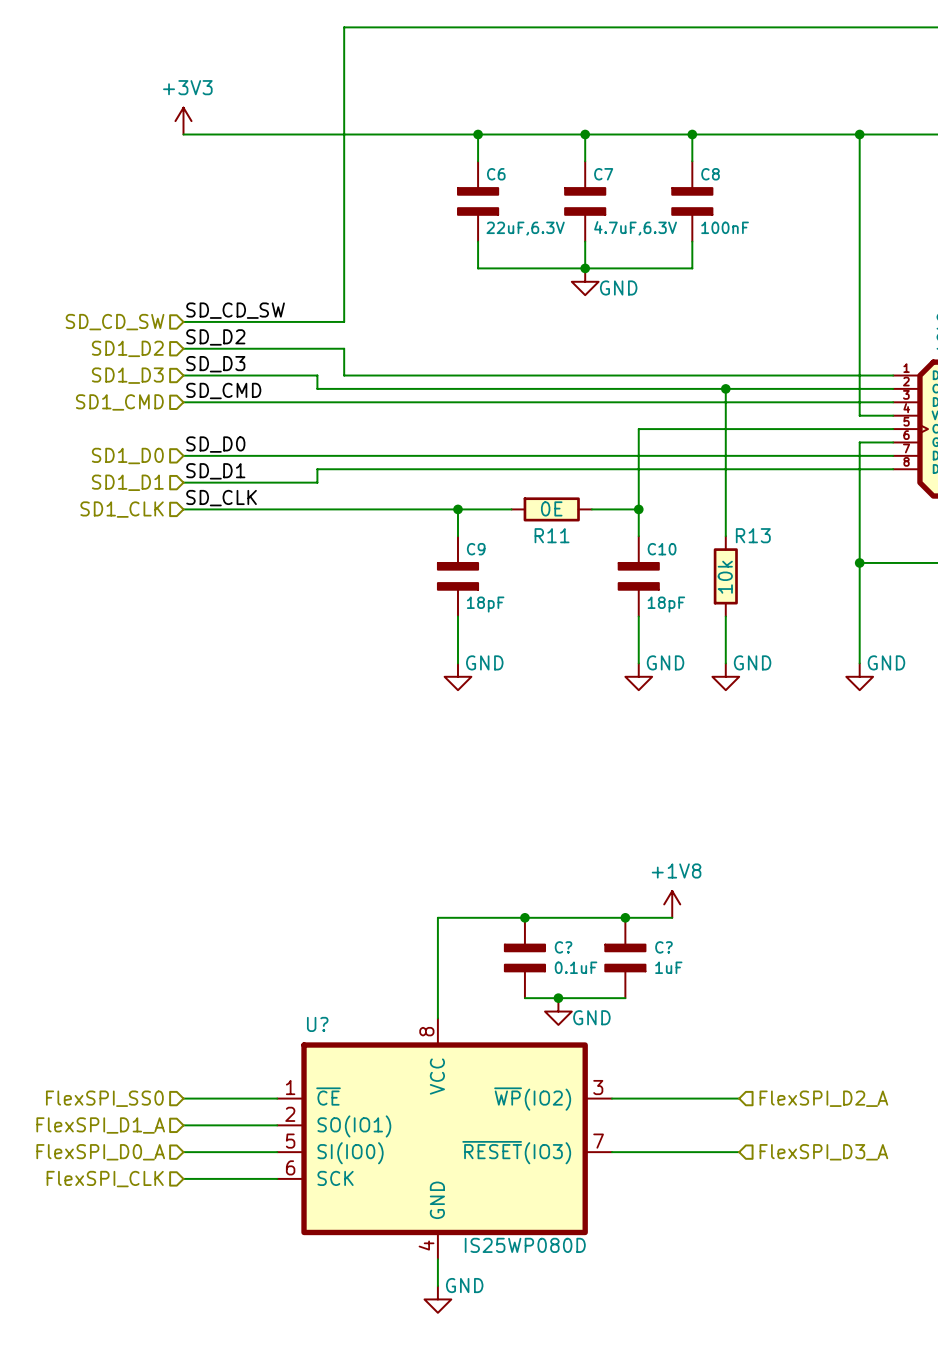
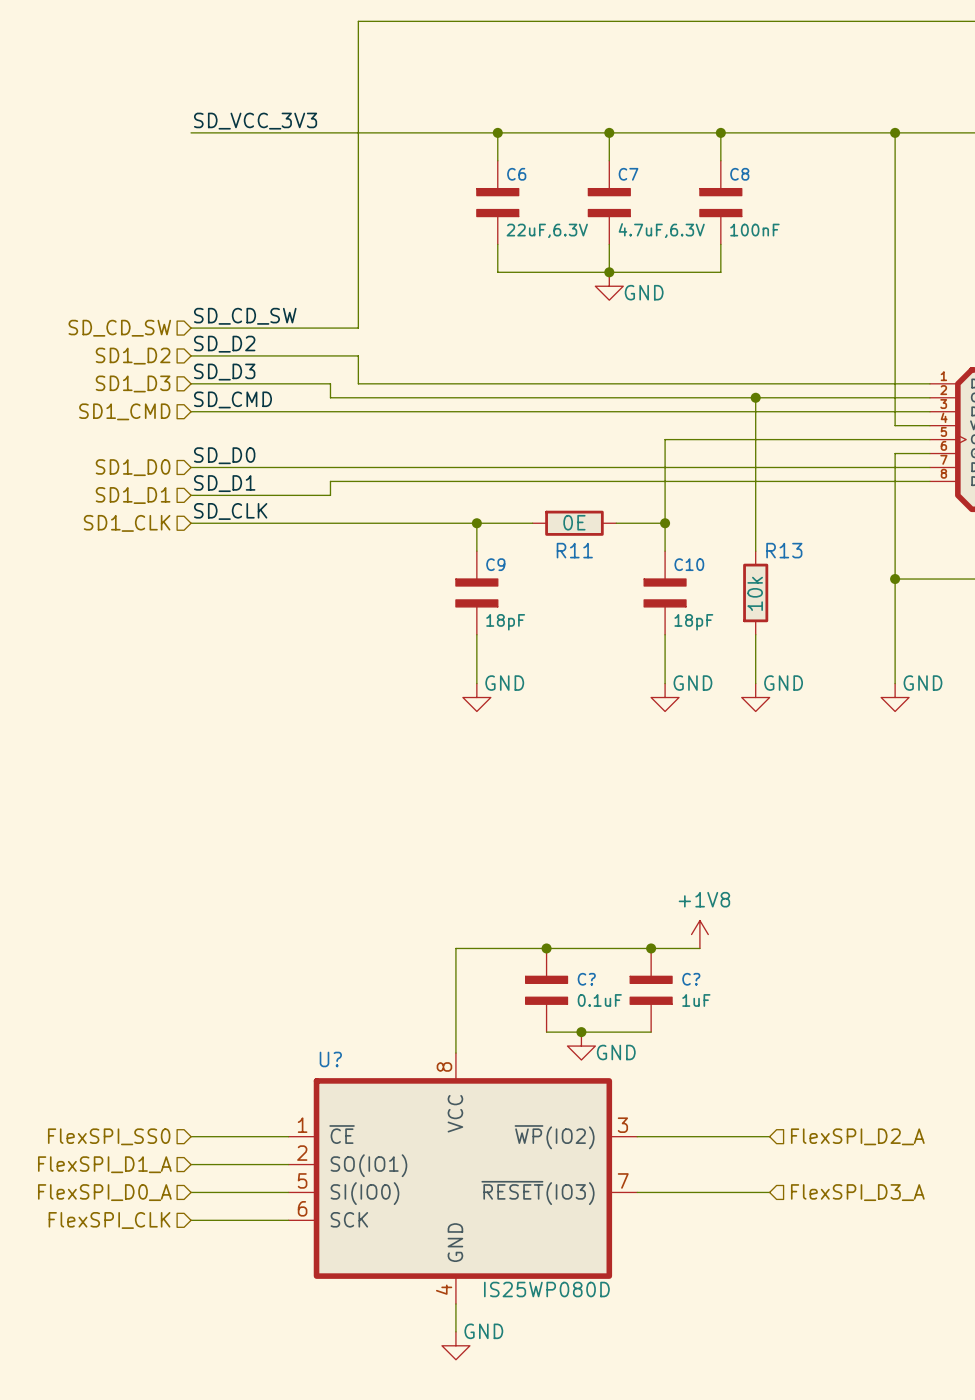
power symbol: +3V3 (183, 121) -> none
label: none -> SD_VCC_3V3 (255, 121)

